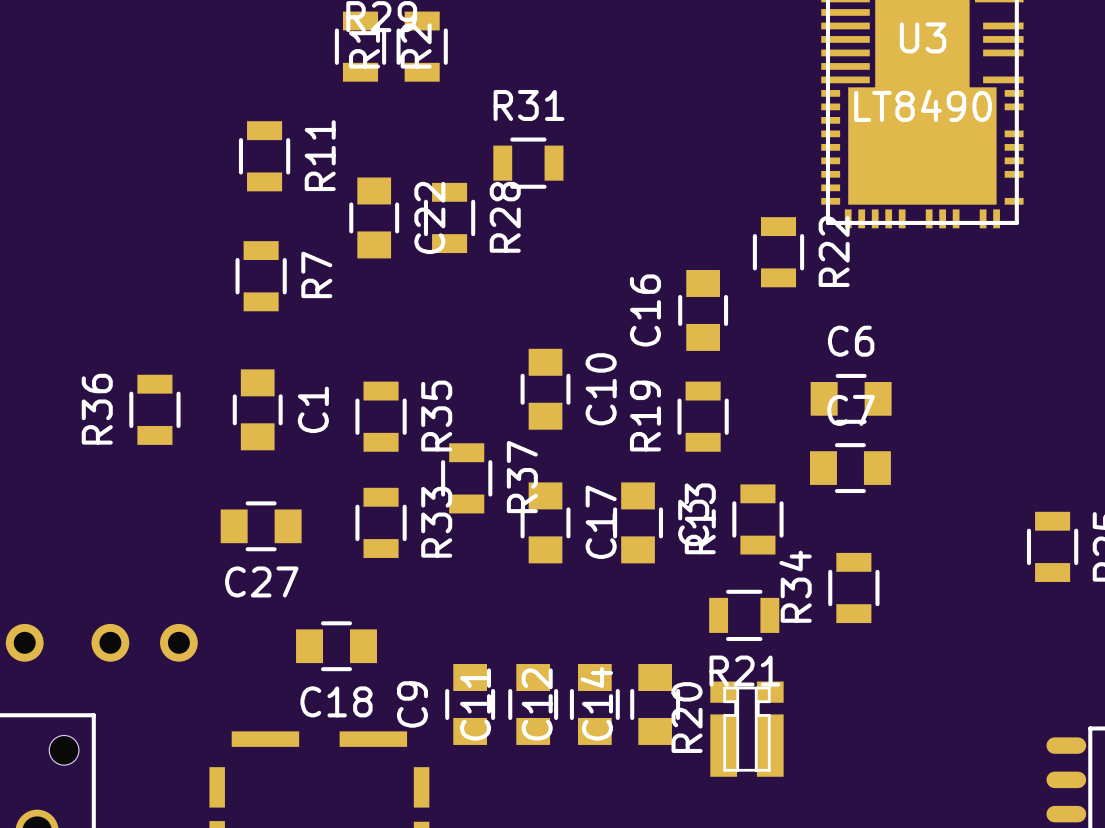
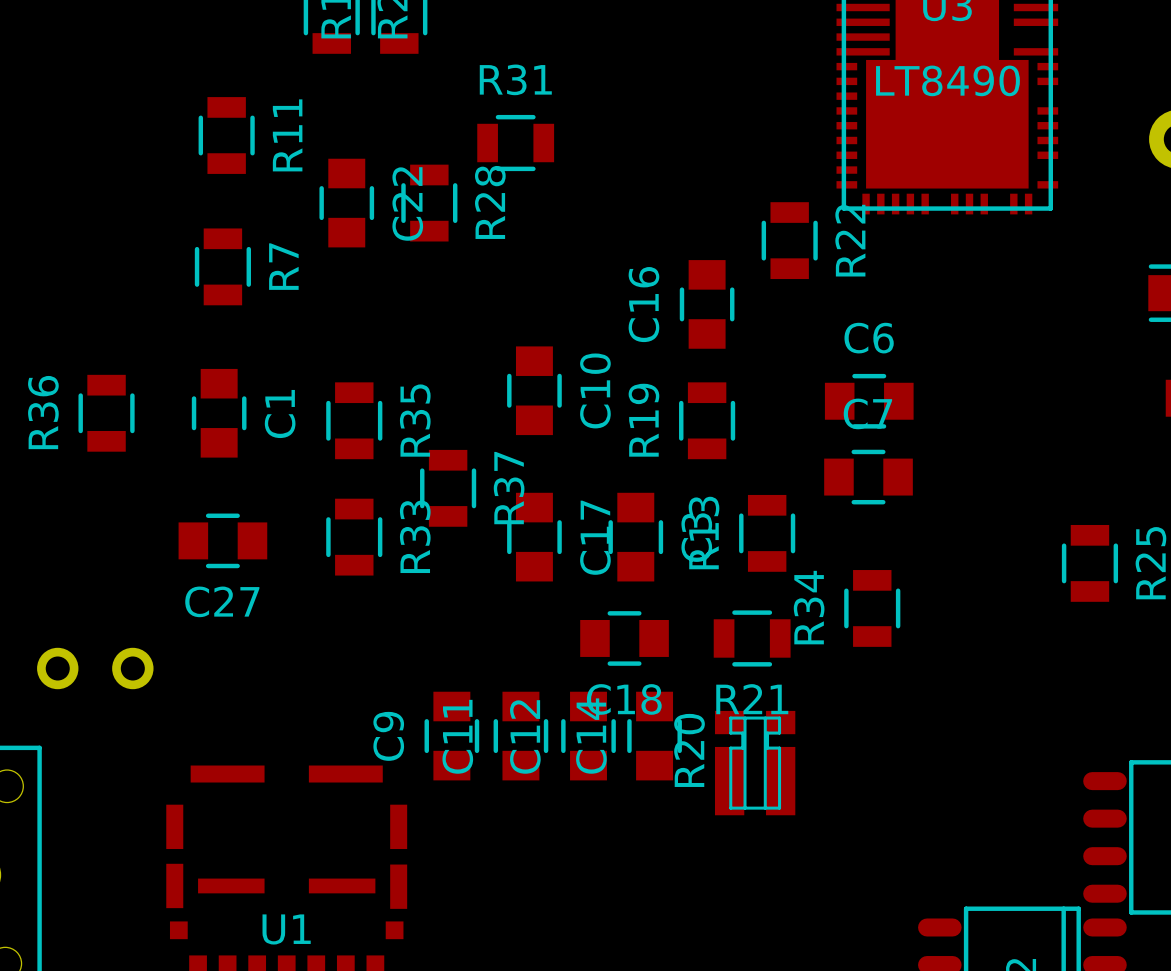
C18 position: (336, 646) -> (624, 638)

